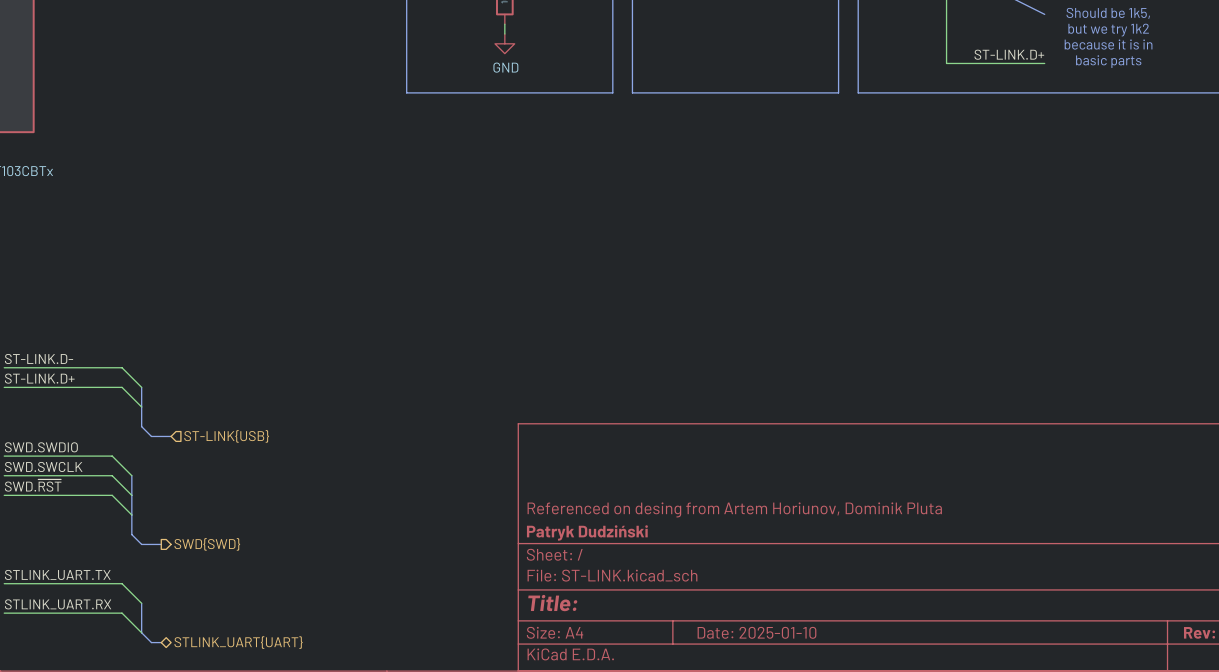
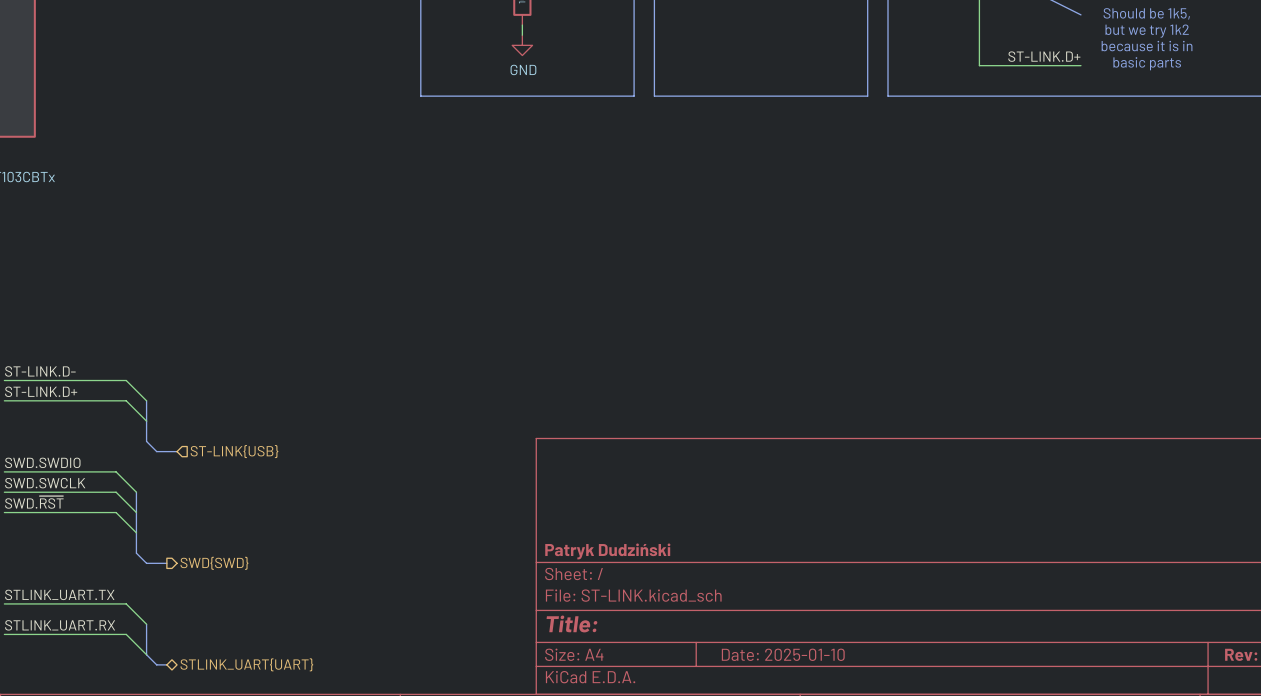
title block: Referenced on desing from Artem Horiunov, Dominik Pluta (734, 509) -> none

